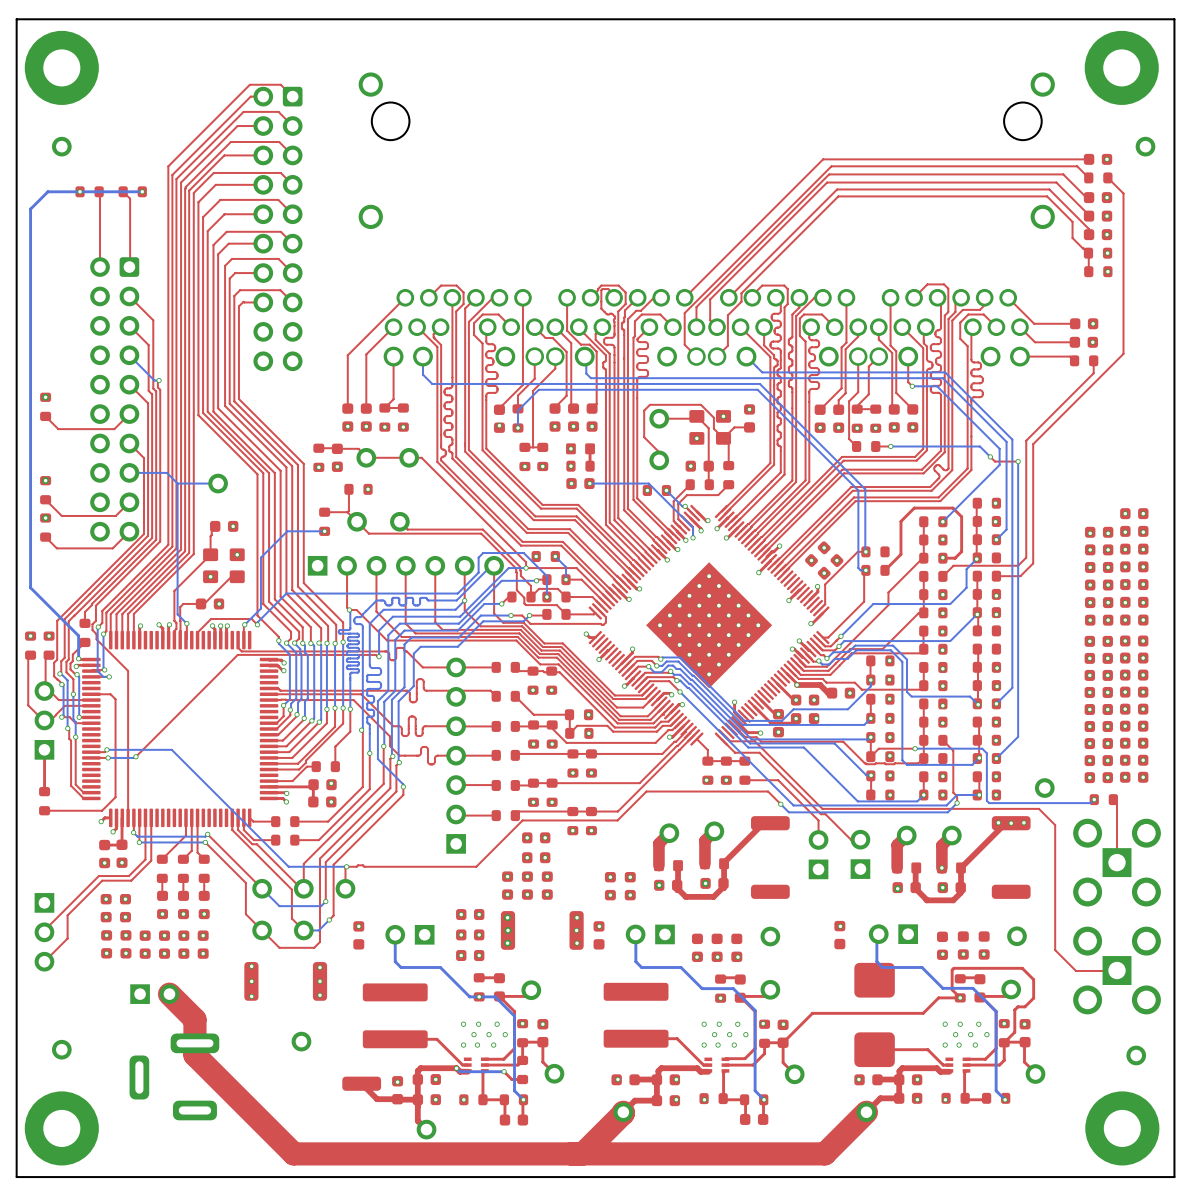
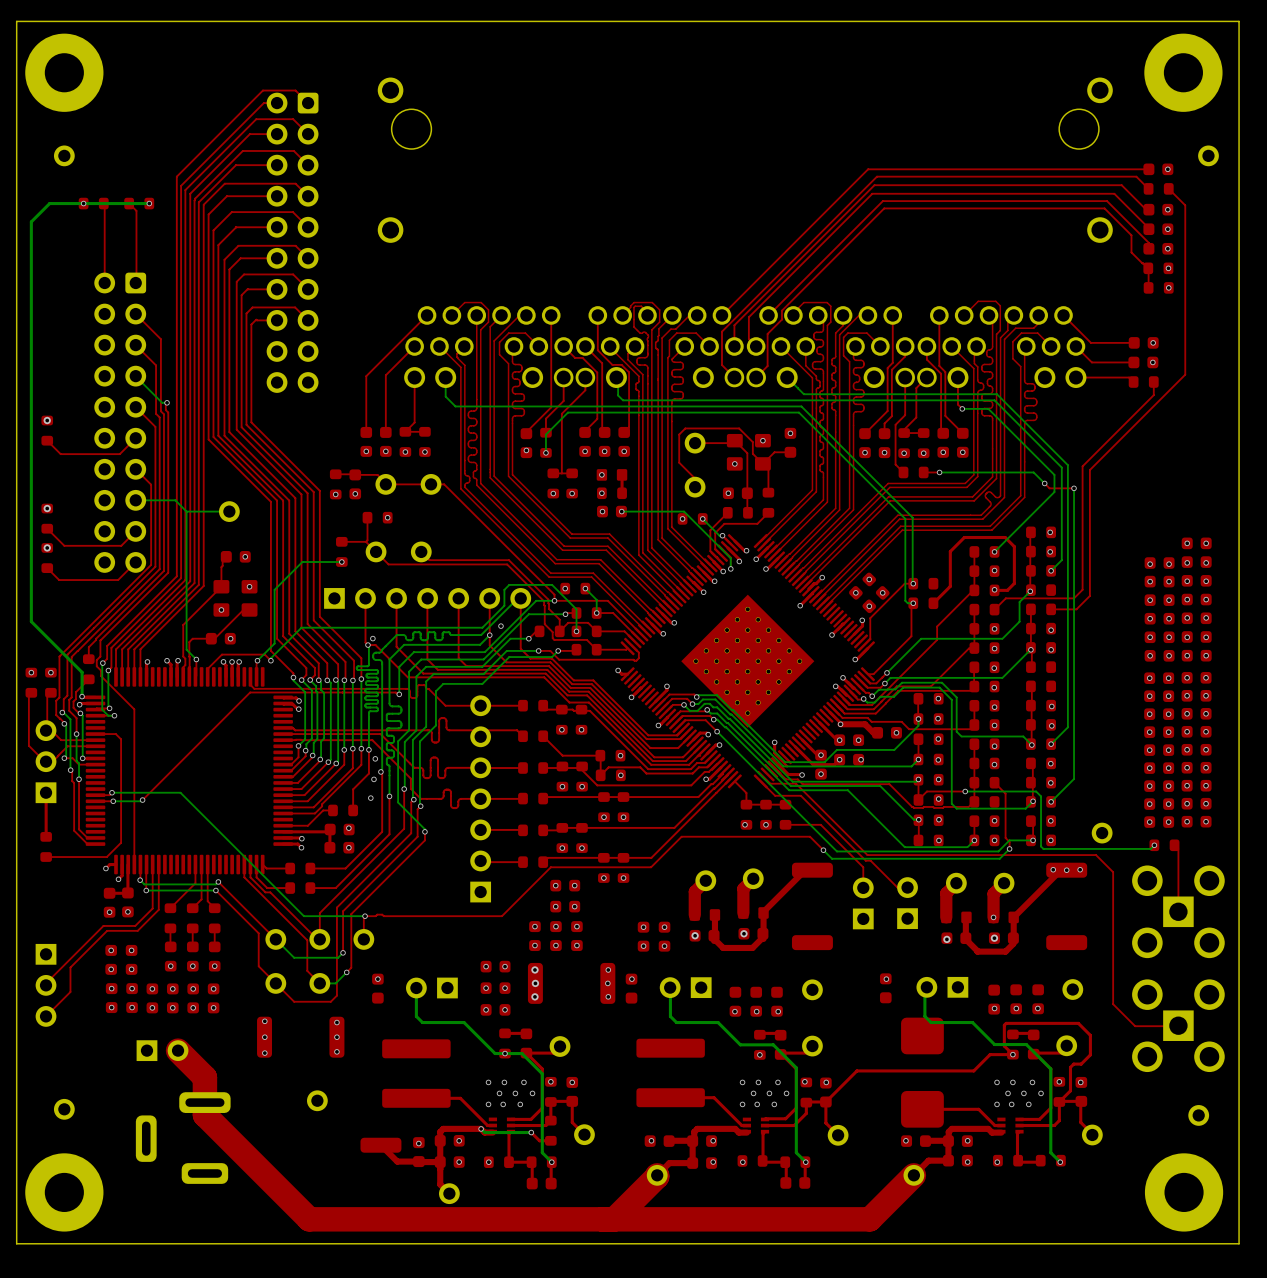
via: none -> (500, 626)
via: none -> (372, 638)
via: none -> (375, 758)
via: none -> (373, 779)
via: none -> (370, 798)

